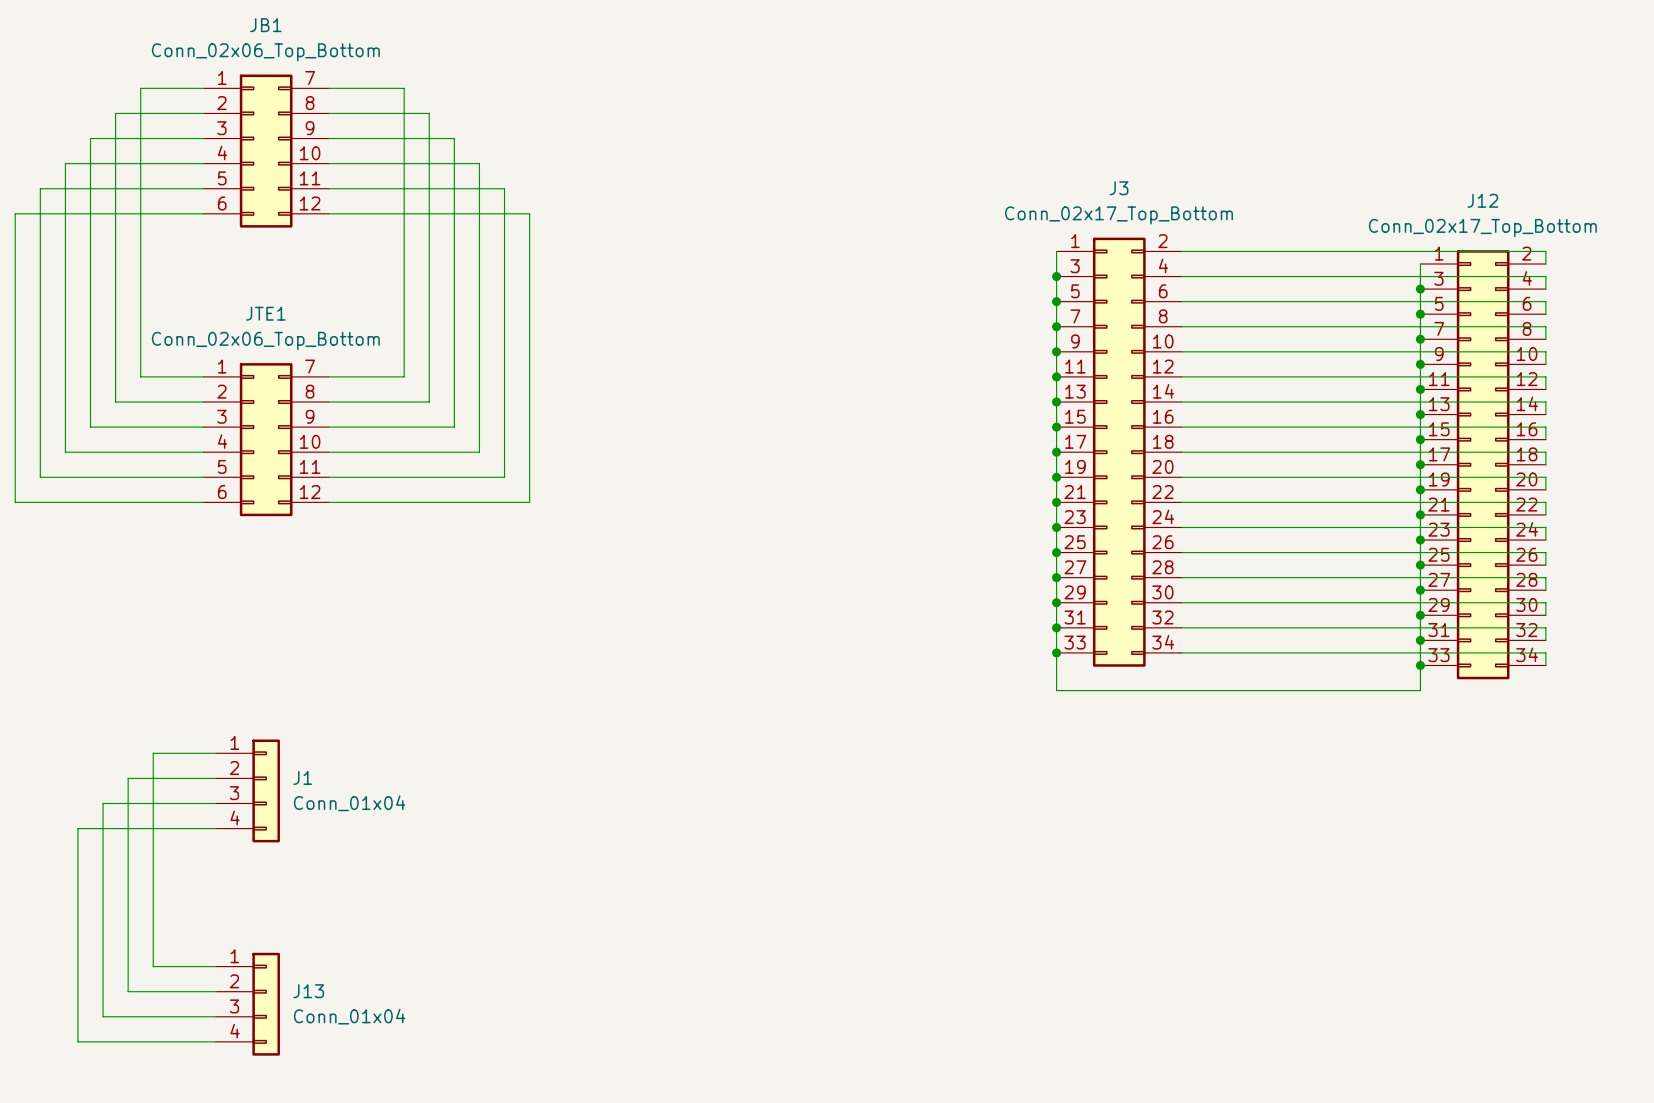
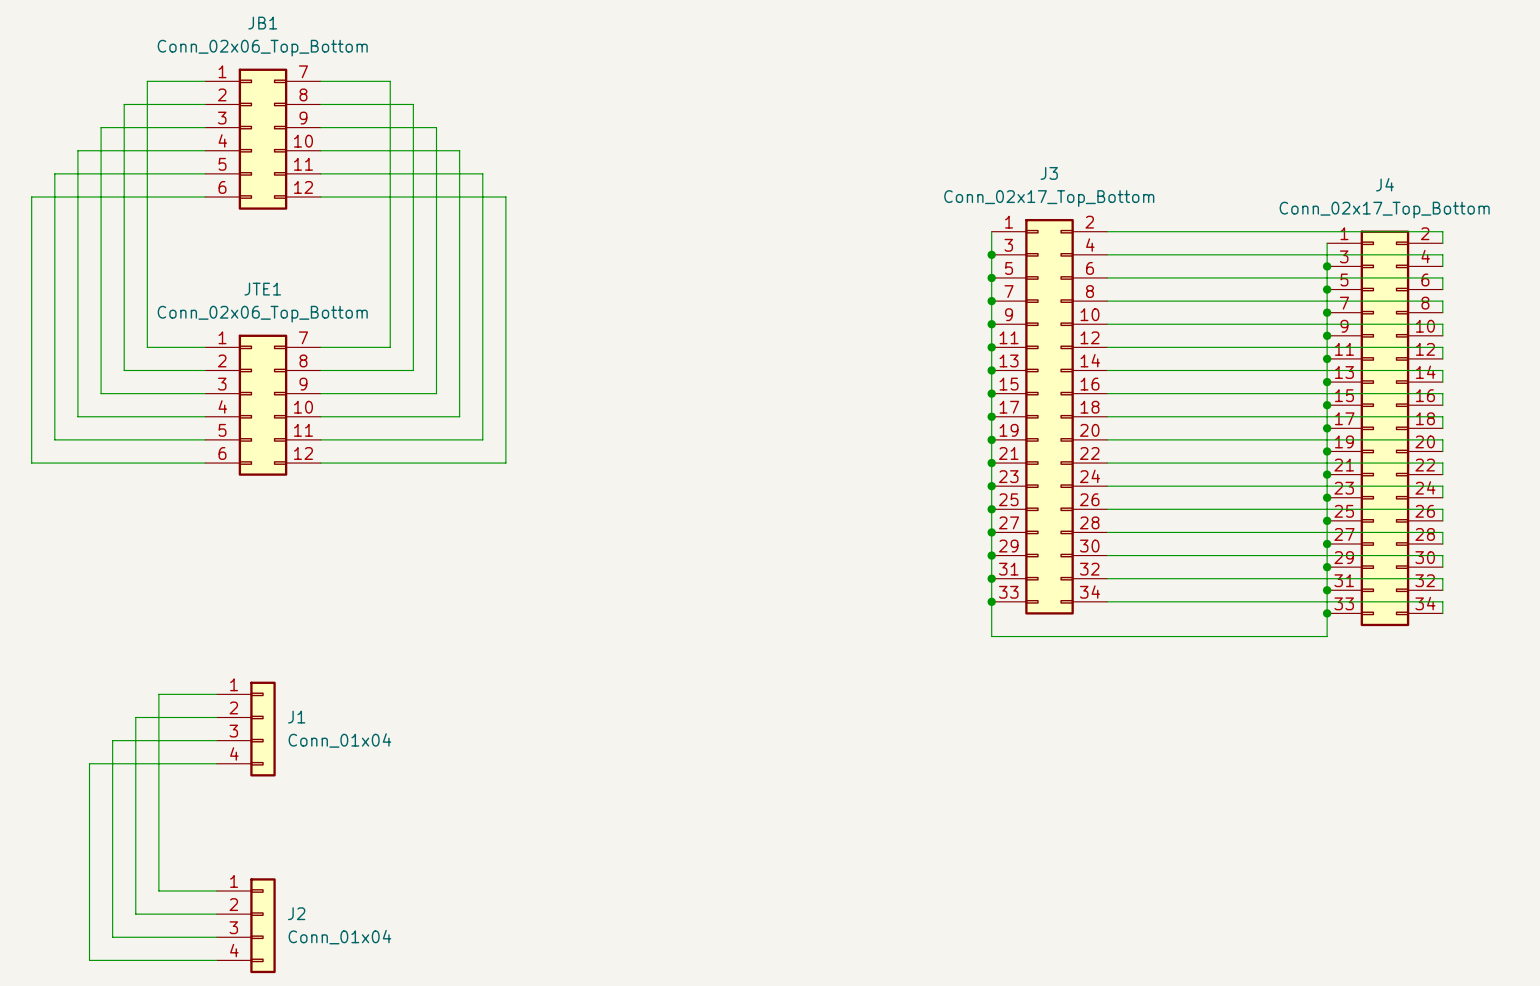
J12 name: J12 (1482, 200) -> J4 (1384, 184)
J13 name: J13 (308, 991) -> J2 (296, 913)

